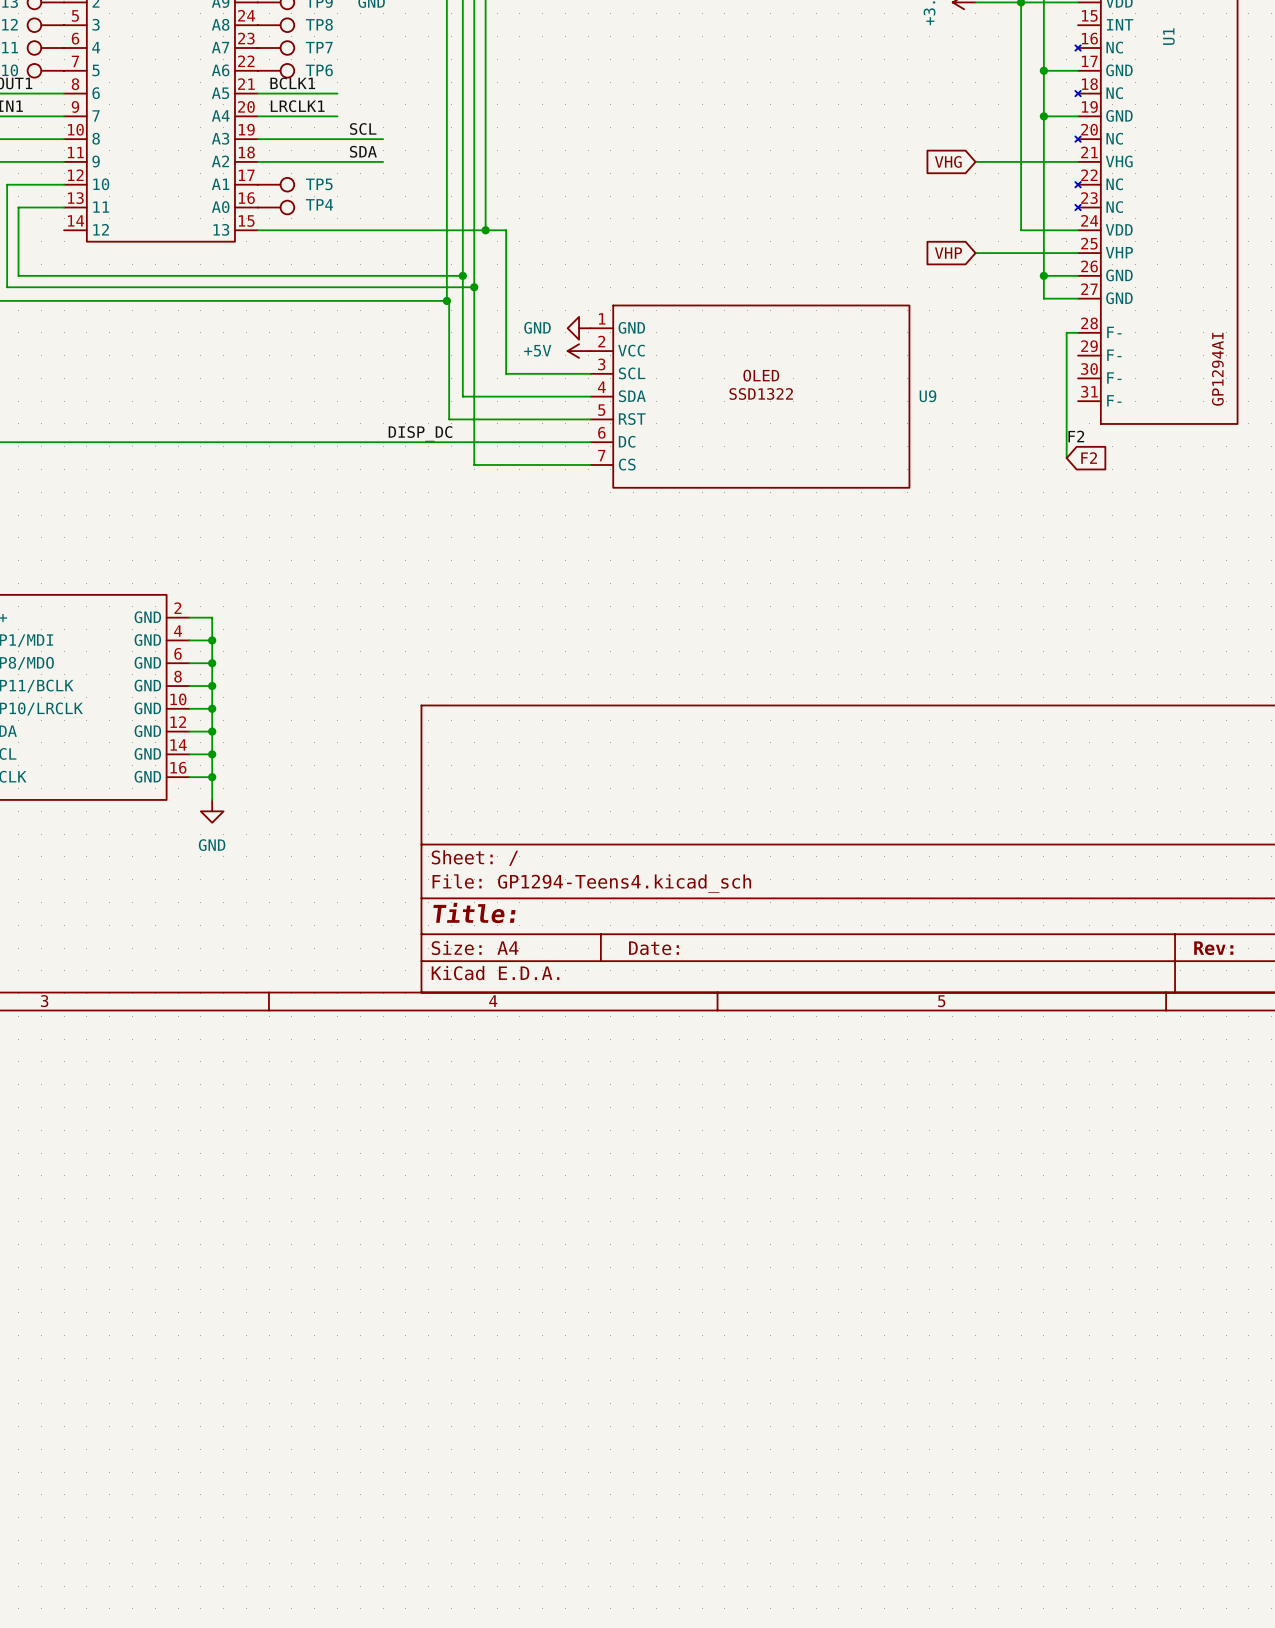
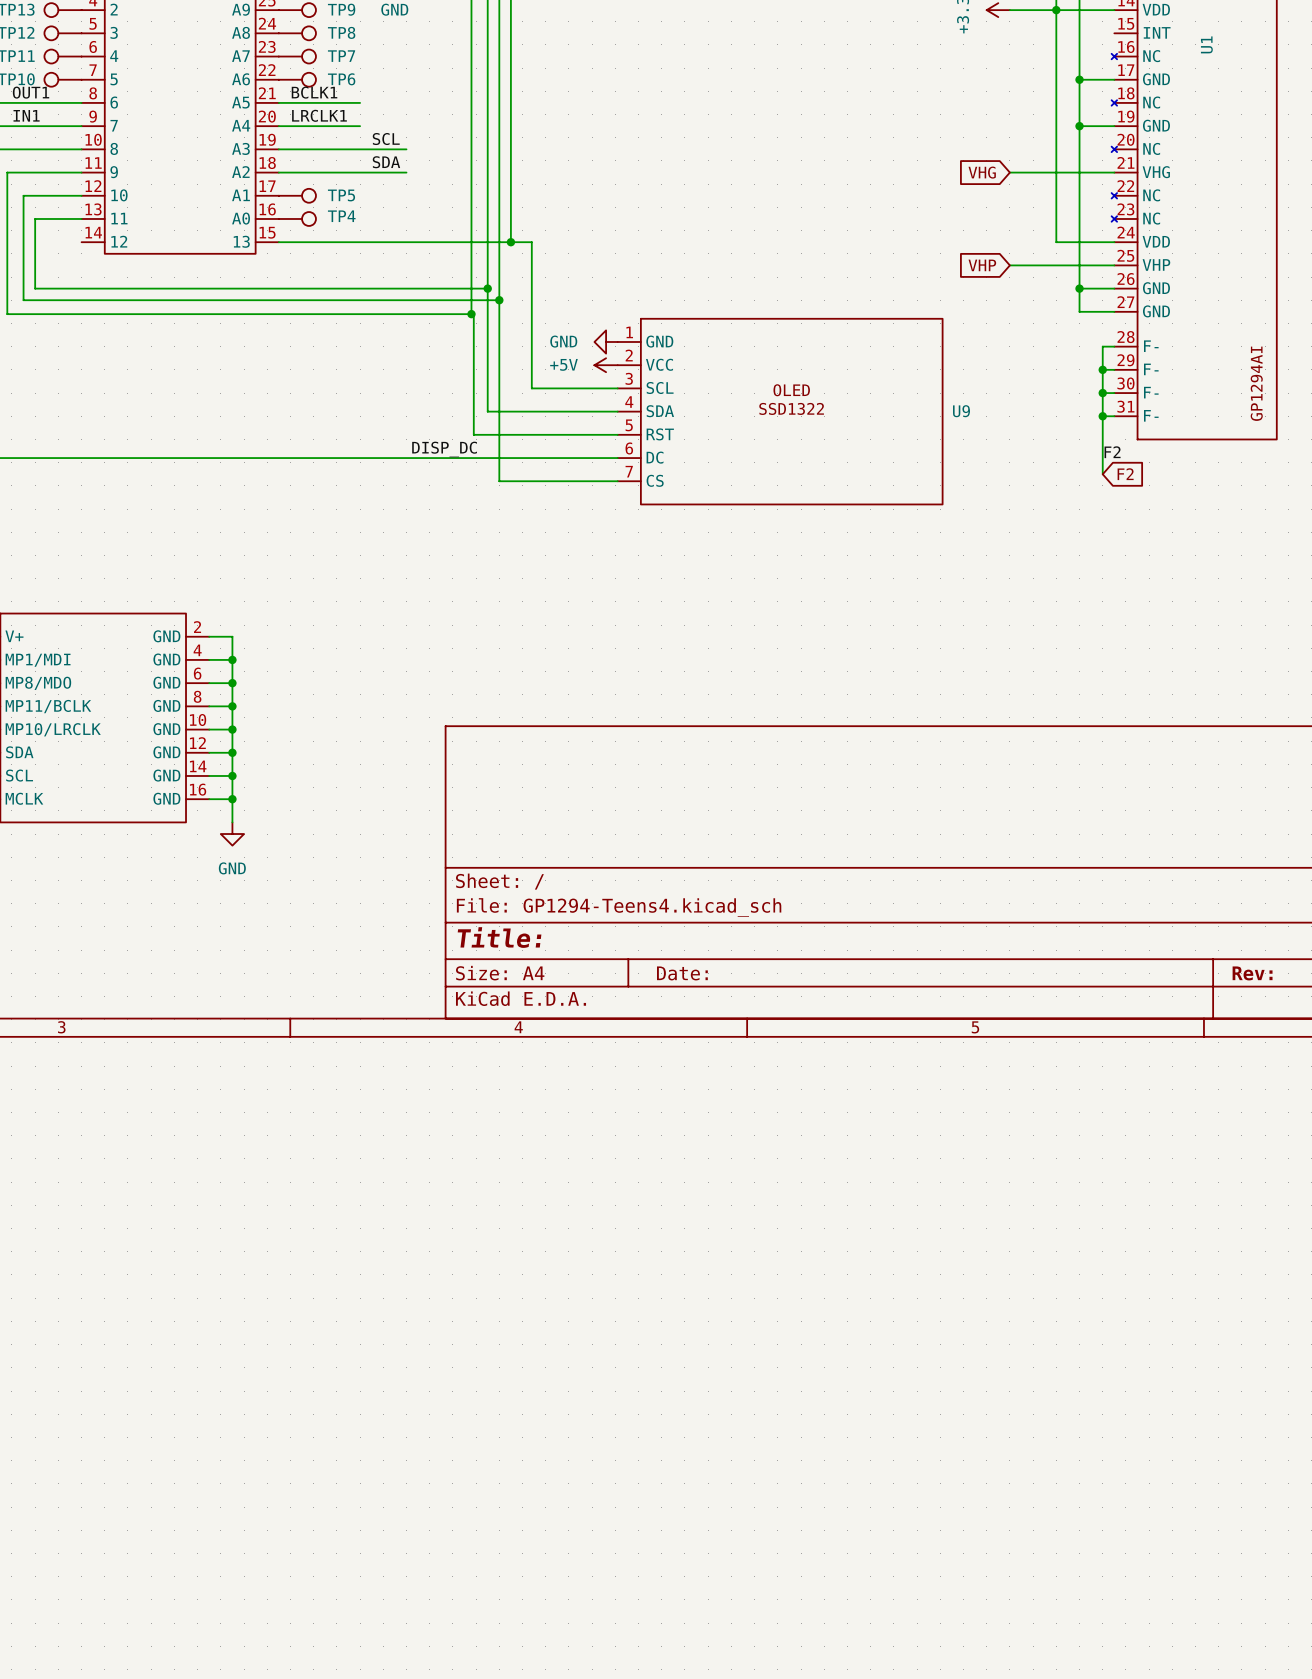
wire: none -> (1102, 369) (1114, 369)
junction: none -> (1102, 369)
wire: none -> (1102, 393) (1114, 393)
junction: none -> (1102, 393)
wire: none -> (1102, 416) (1114, 416)
junction: none -> (1102, 416)

